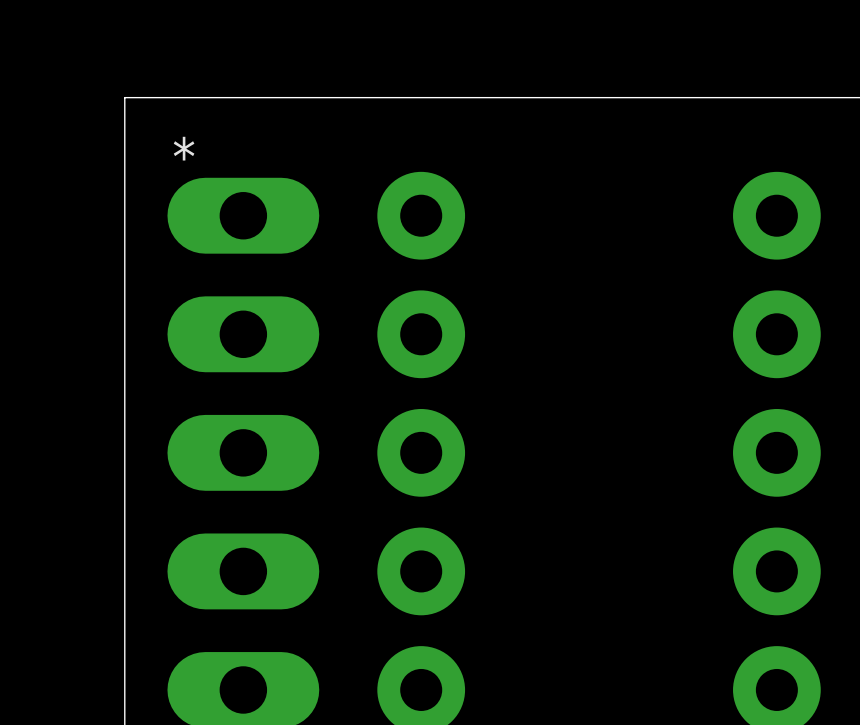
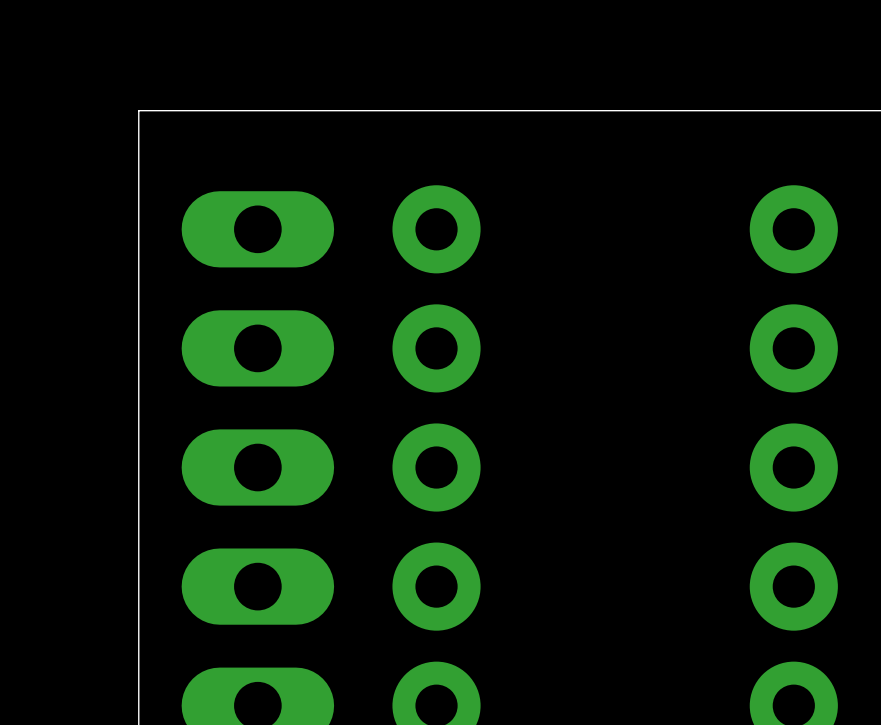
text: * (184, 148) -> none

